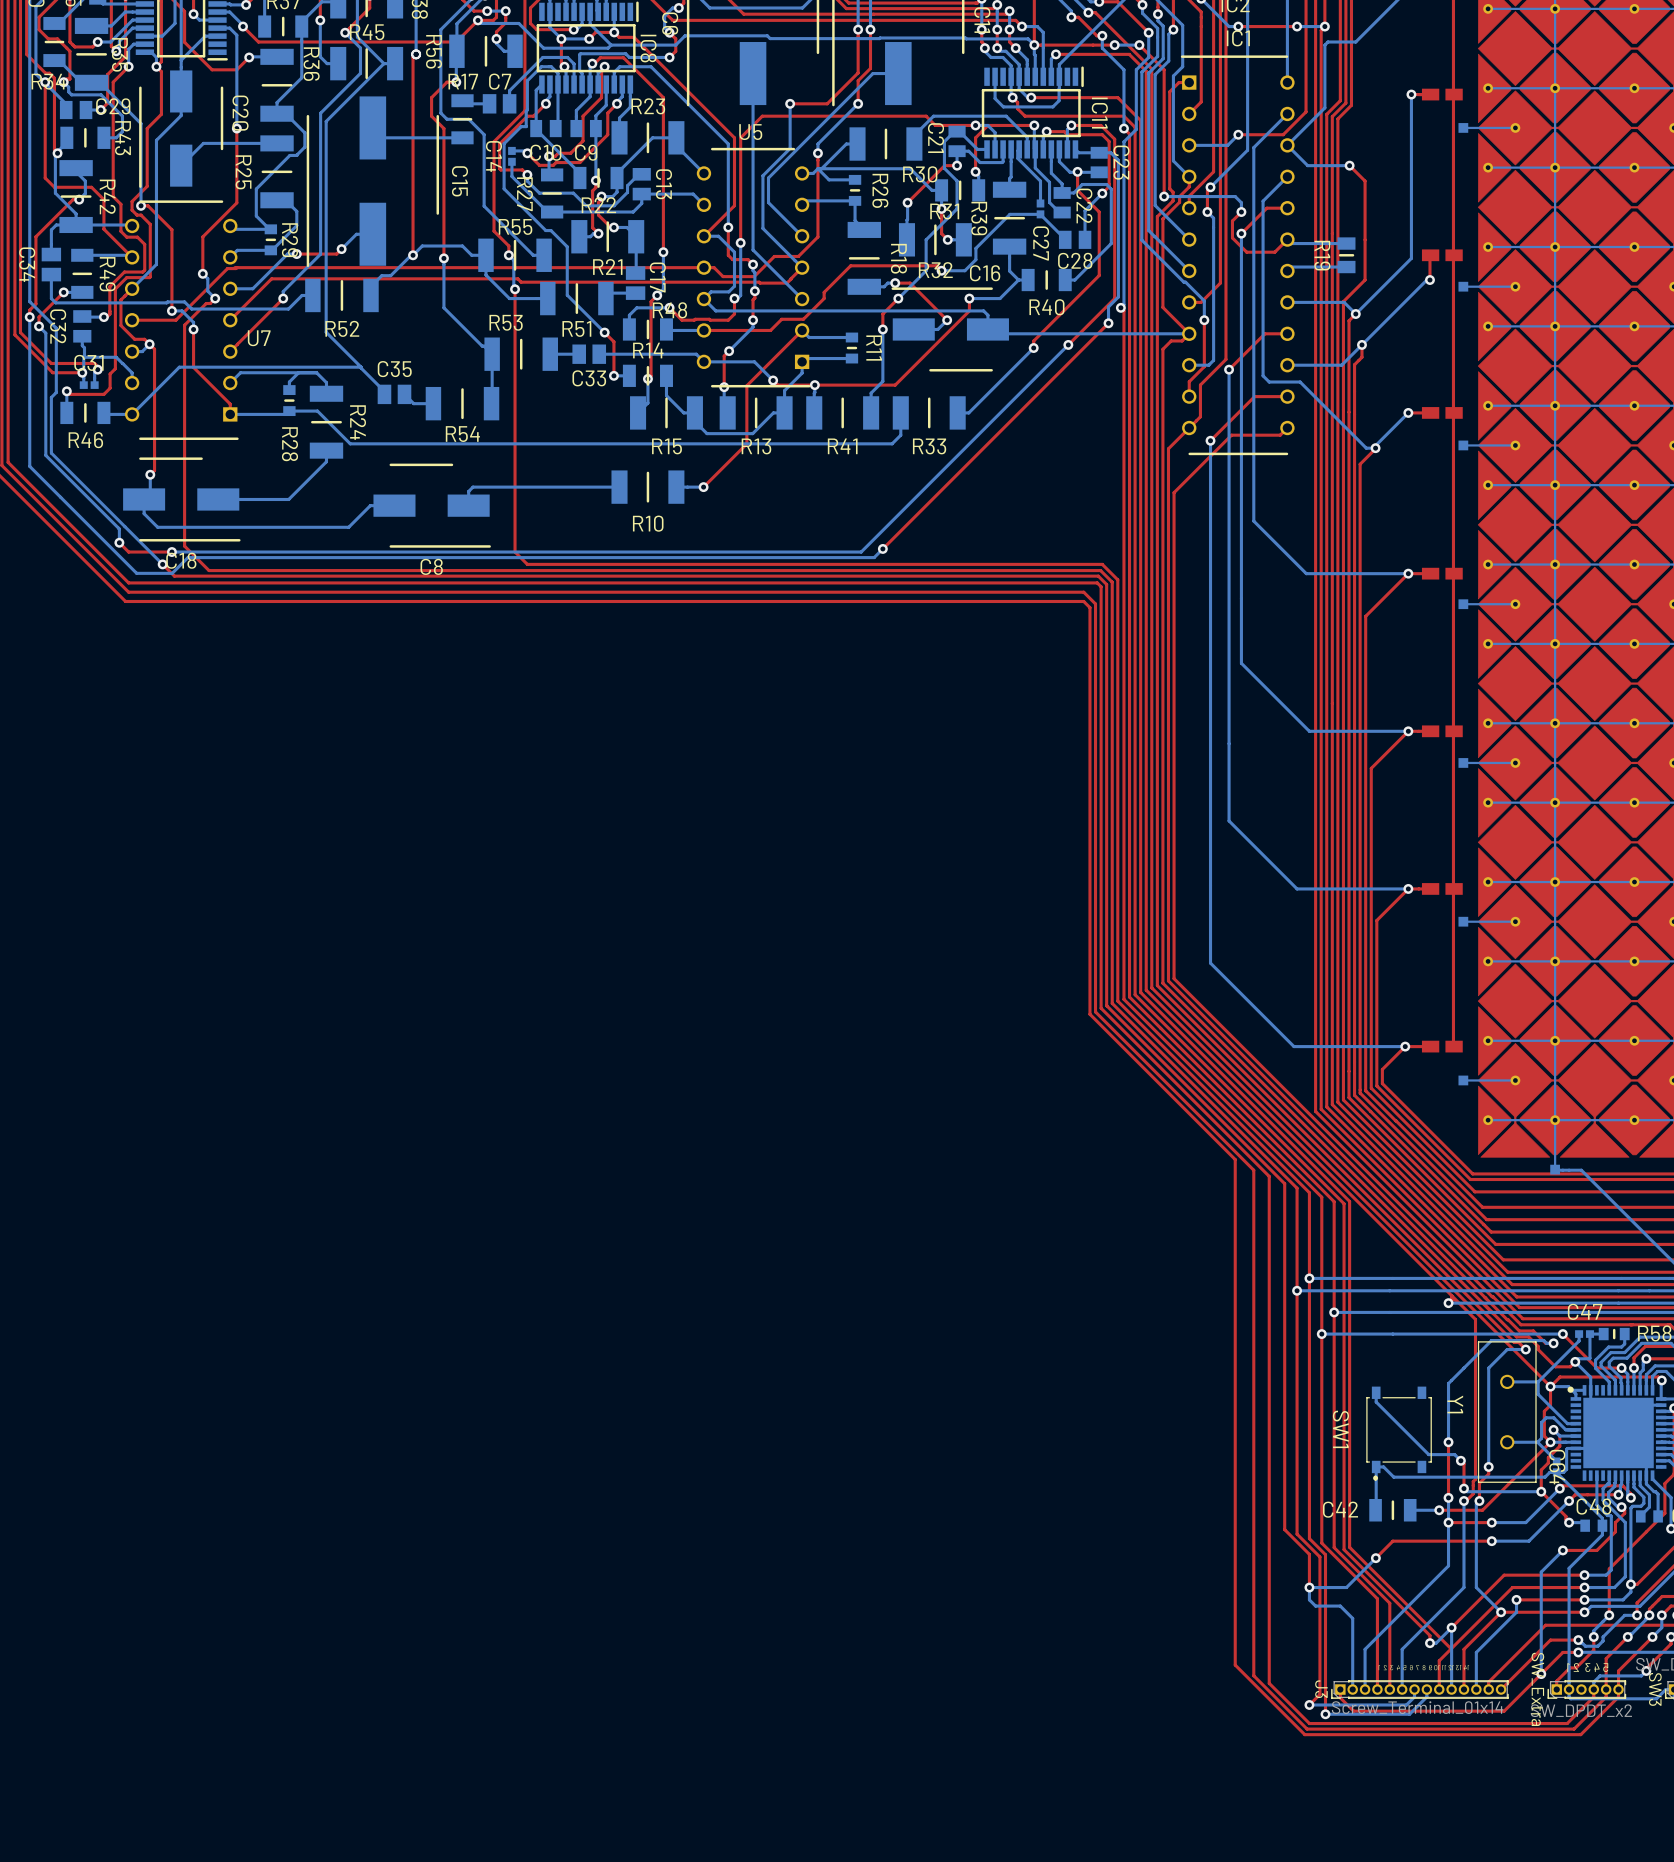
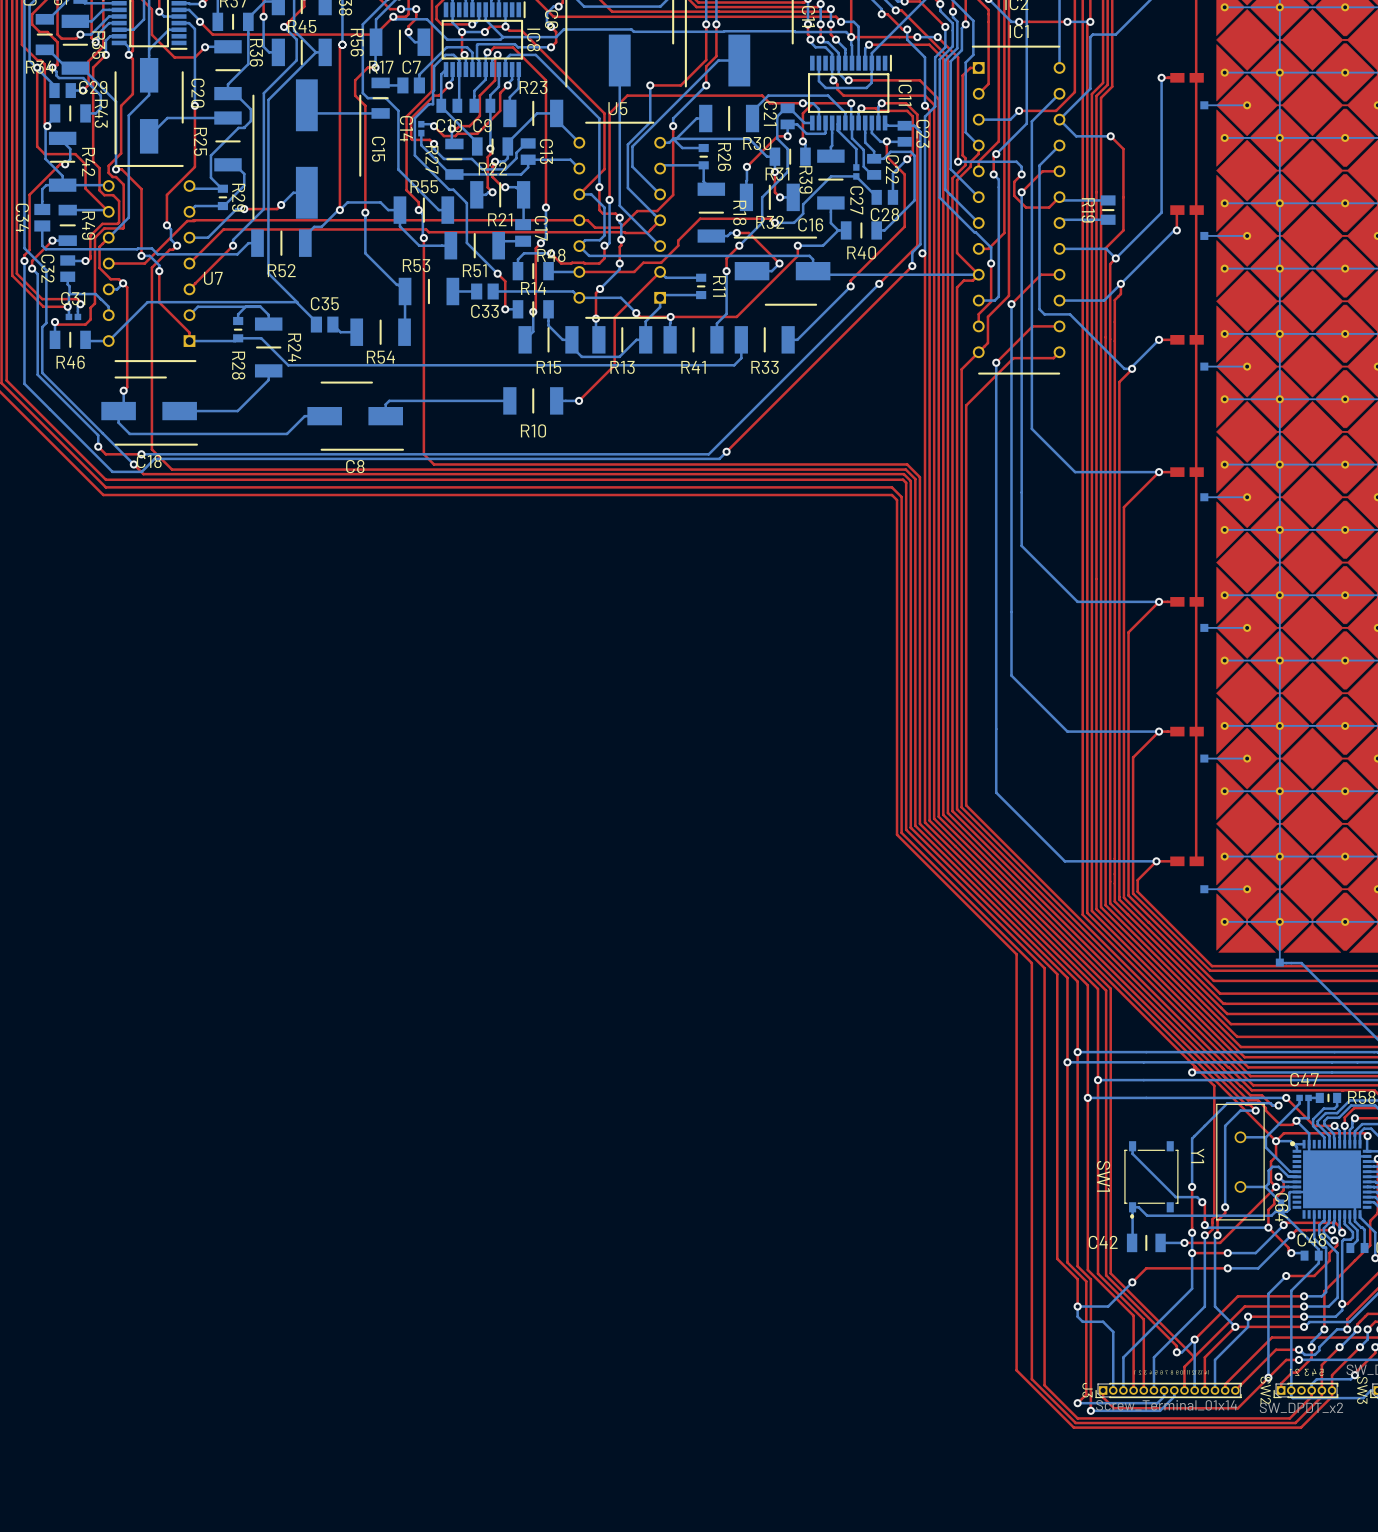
SW_Extra name: SW_Extra (1537, 1689) -> SW2 (1265, 1390)

